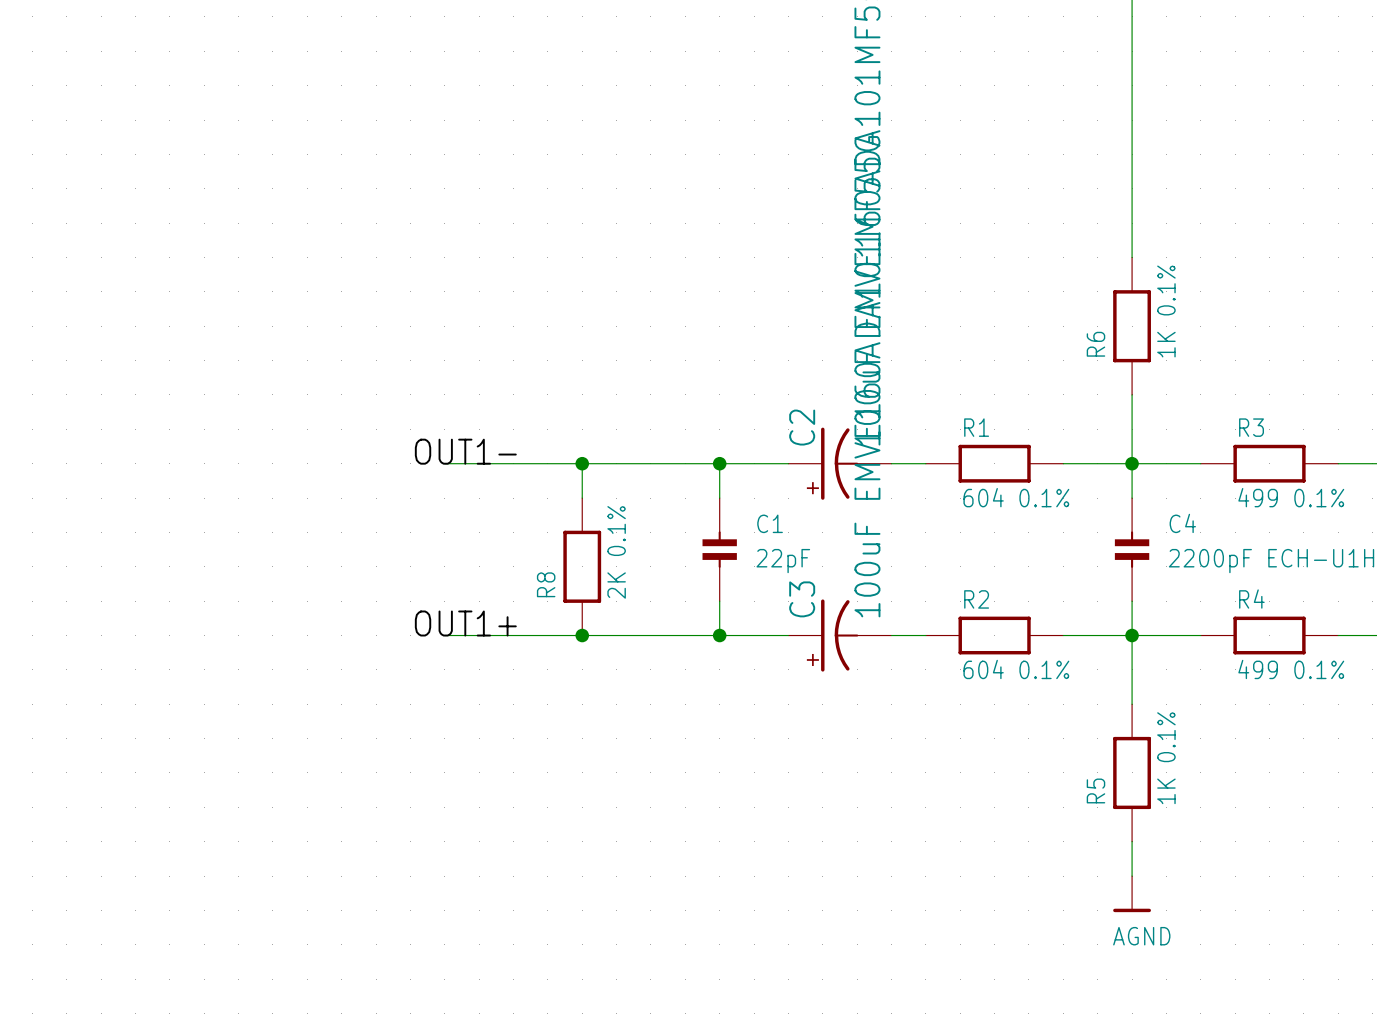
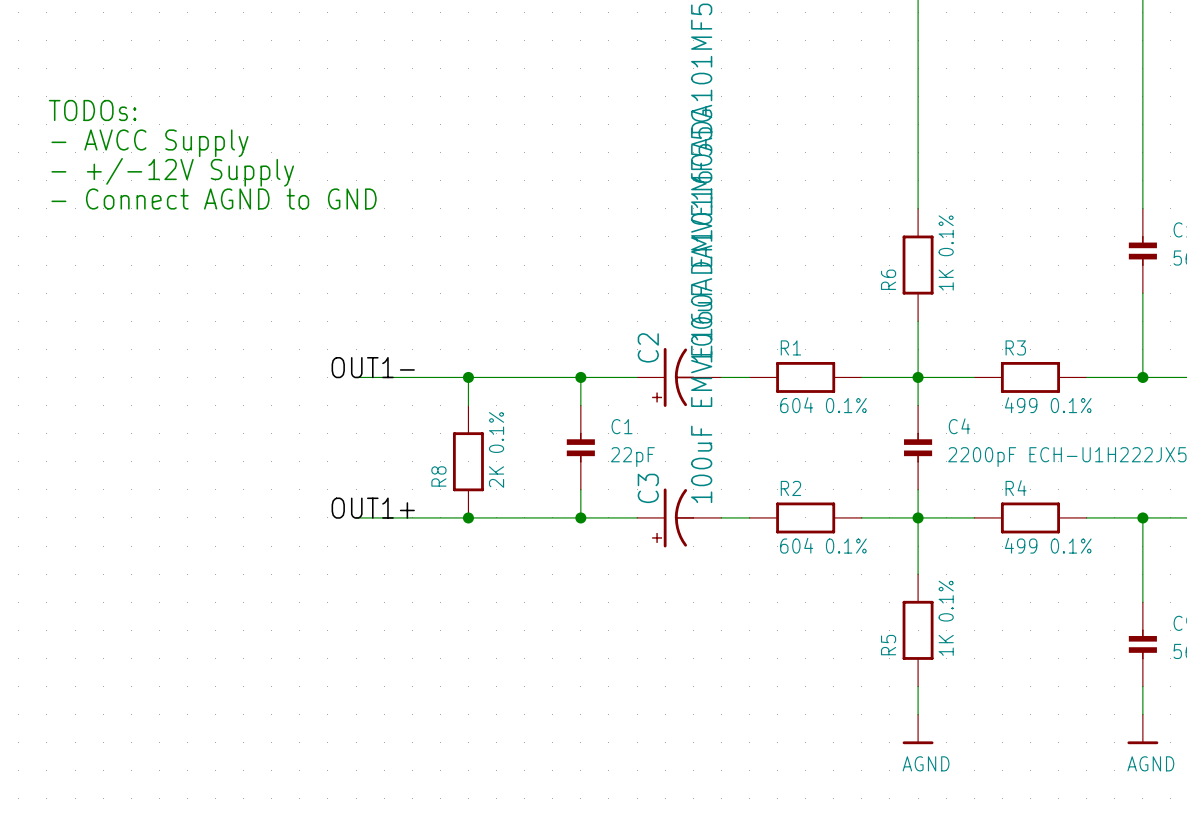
text: none -> TODOs: (92, 110)
text: none -> - AVCC Supply (149, 143)
text: none -> - +/-12V Supply (172, 172)
text: none -> - Connect AGND to GND (214, 199)

